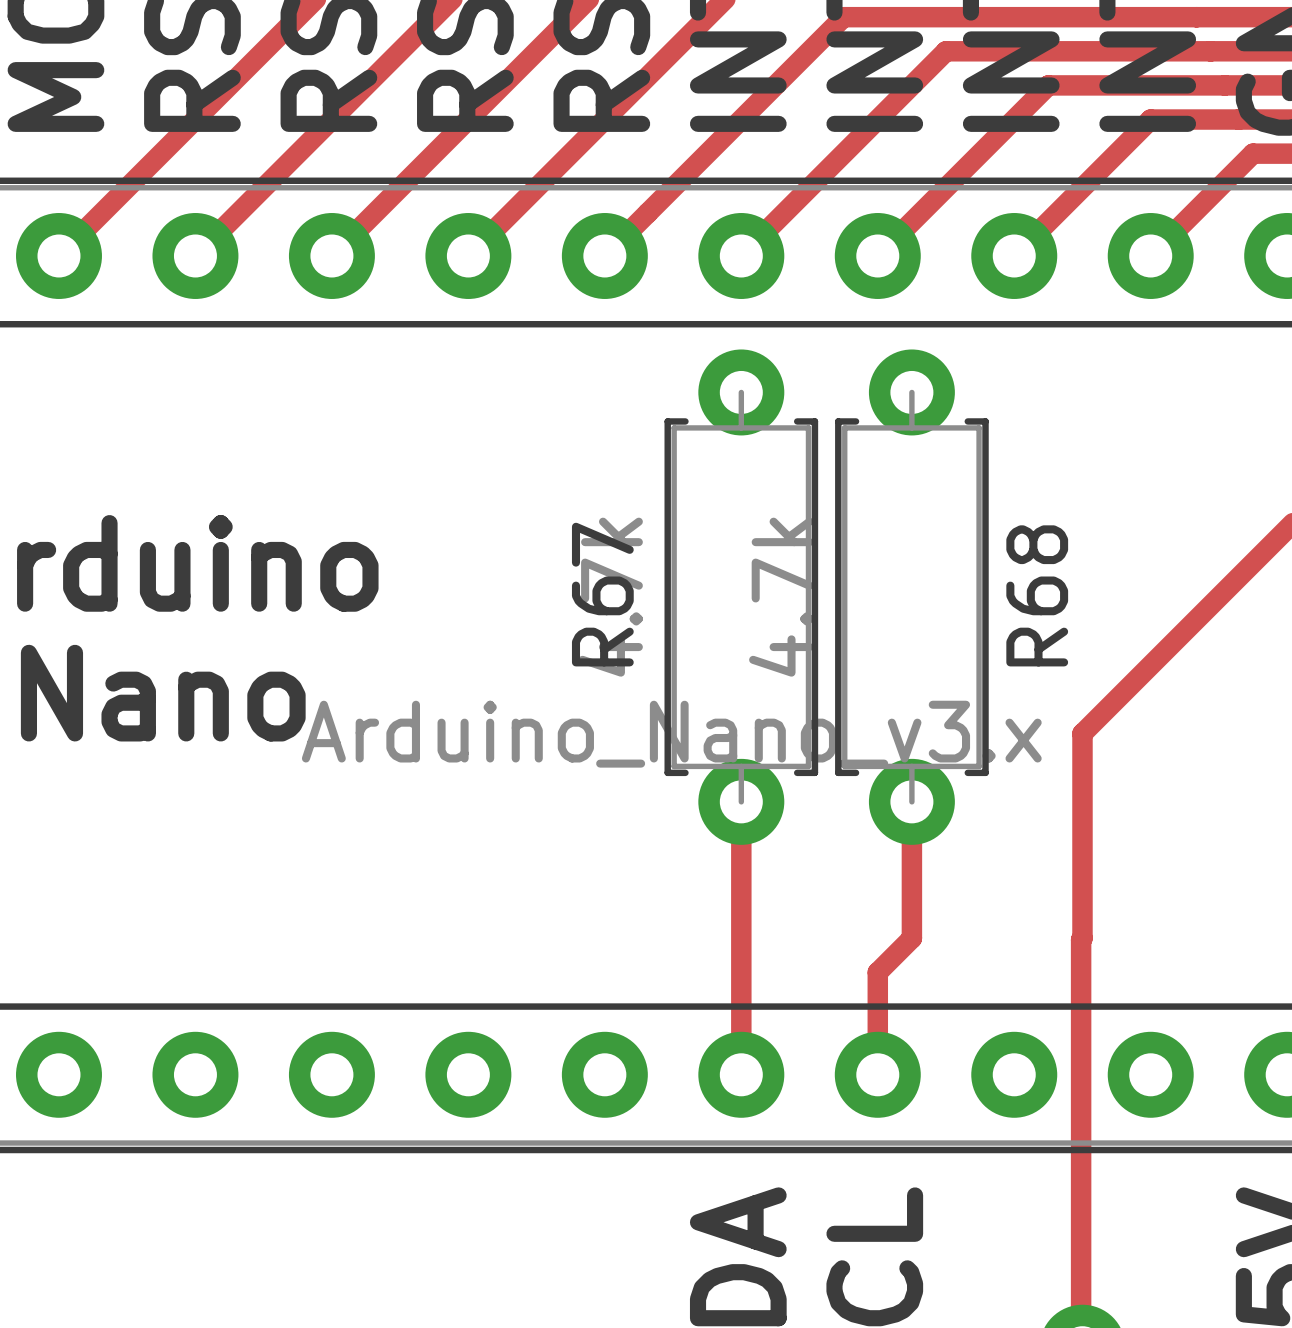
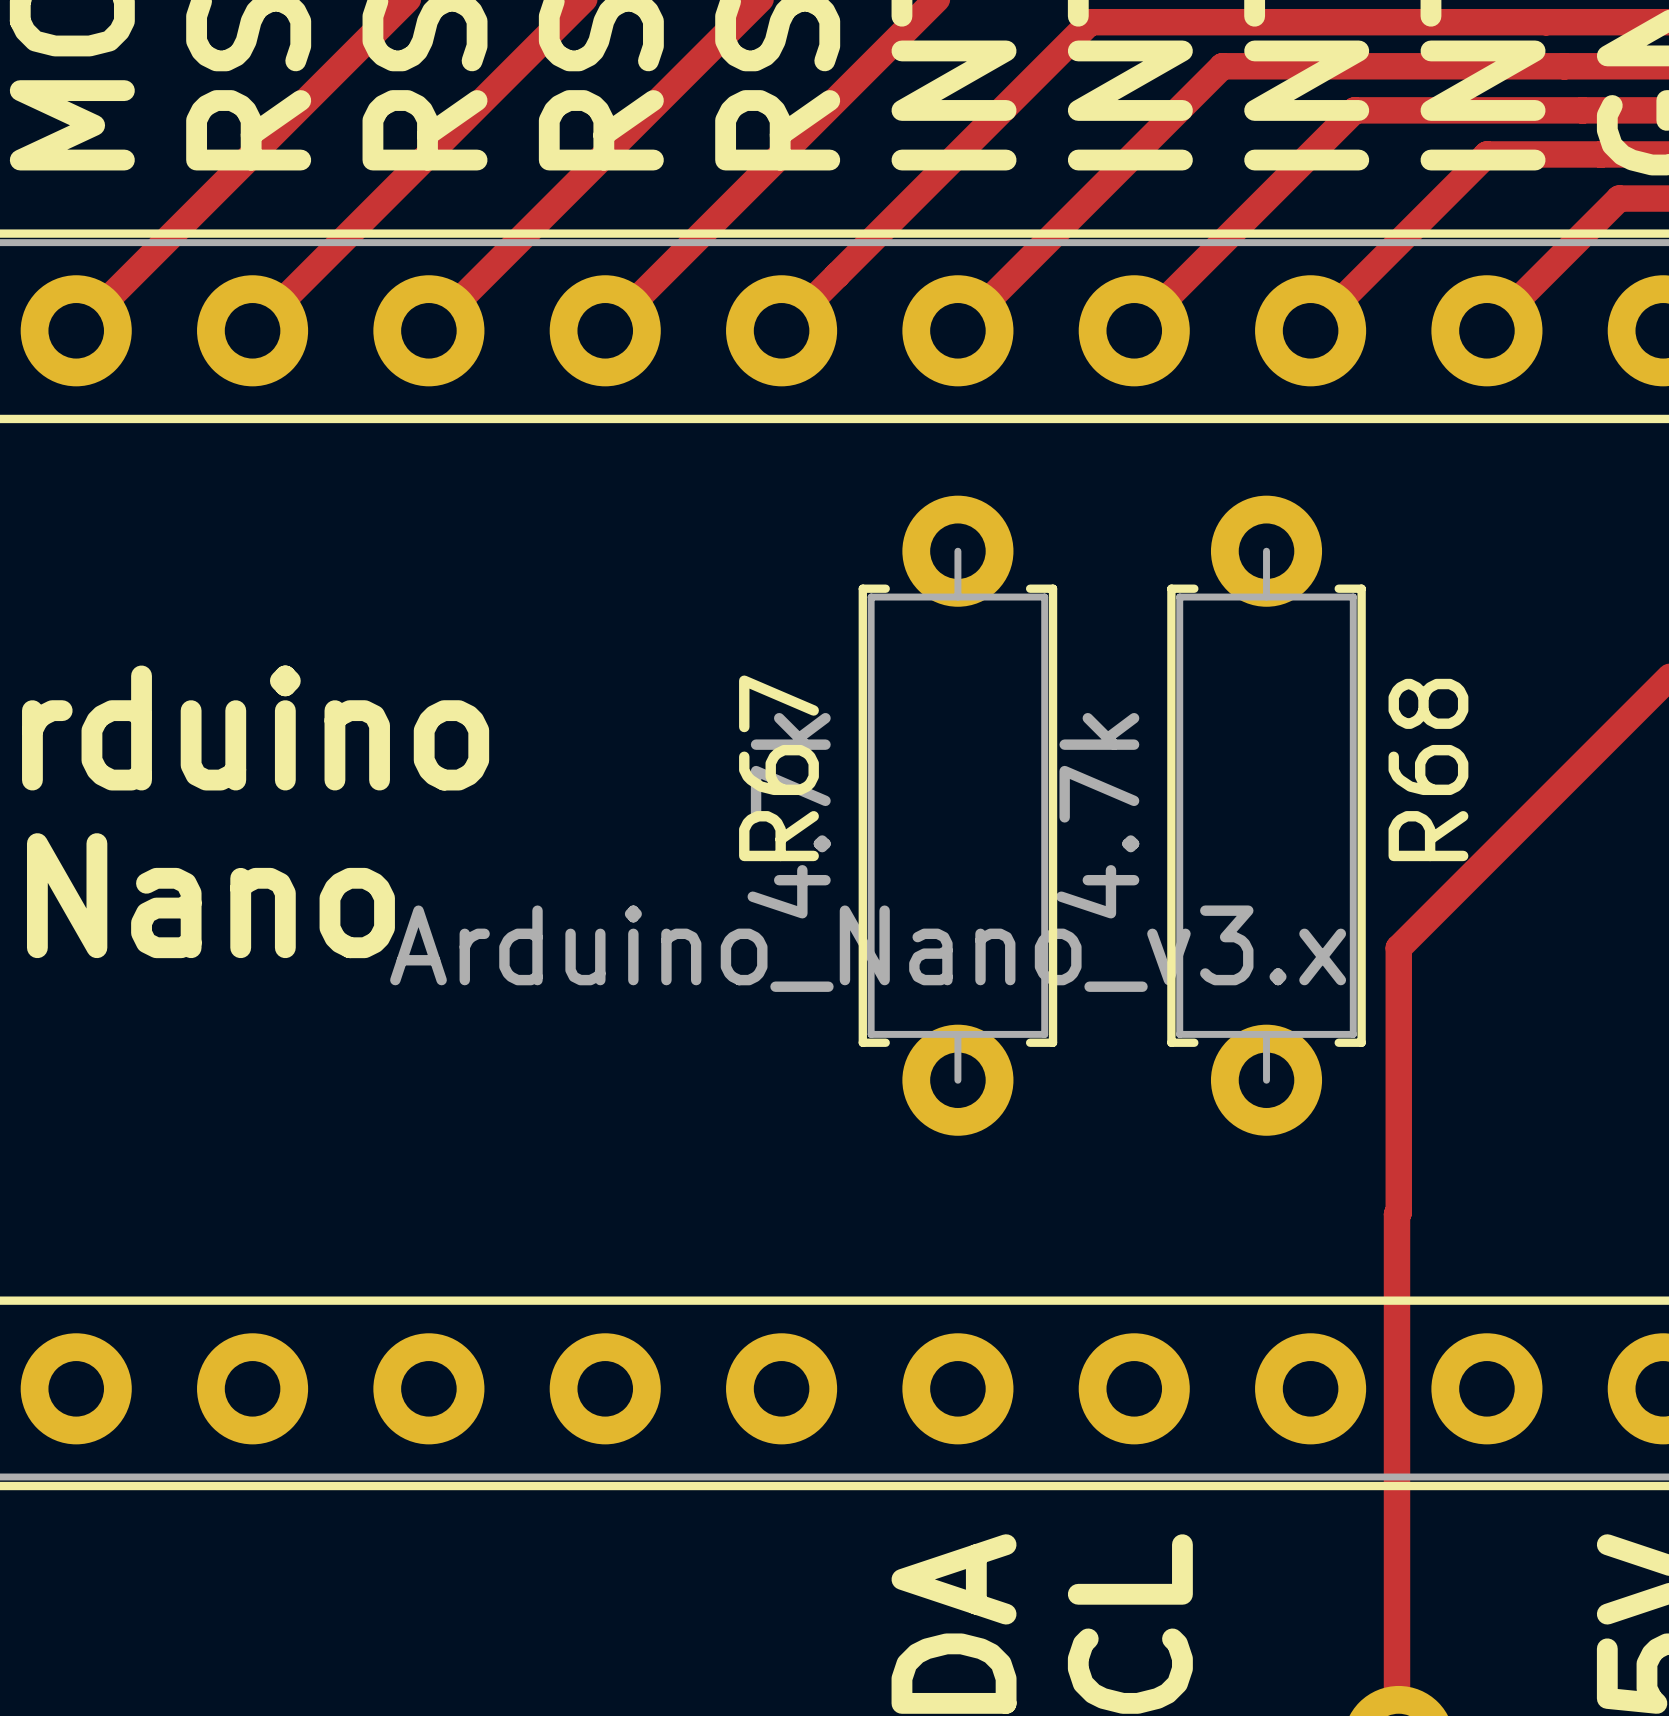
R68 name position: R68 (1037, 595) -> R68 (1428, 769)
R67 position: (741, 597) -> (957, 815)
R68 position: (911, 597) -> (1266, 815)
track: (741, 801) (741, 1074) -> none
track: (911, 801) (911, 938) (877, 972) (877, 1074) -> none

